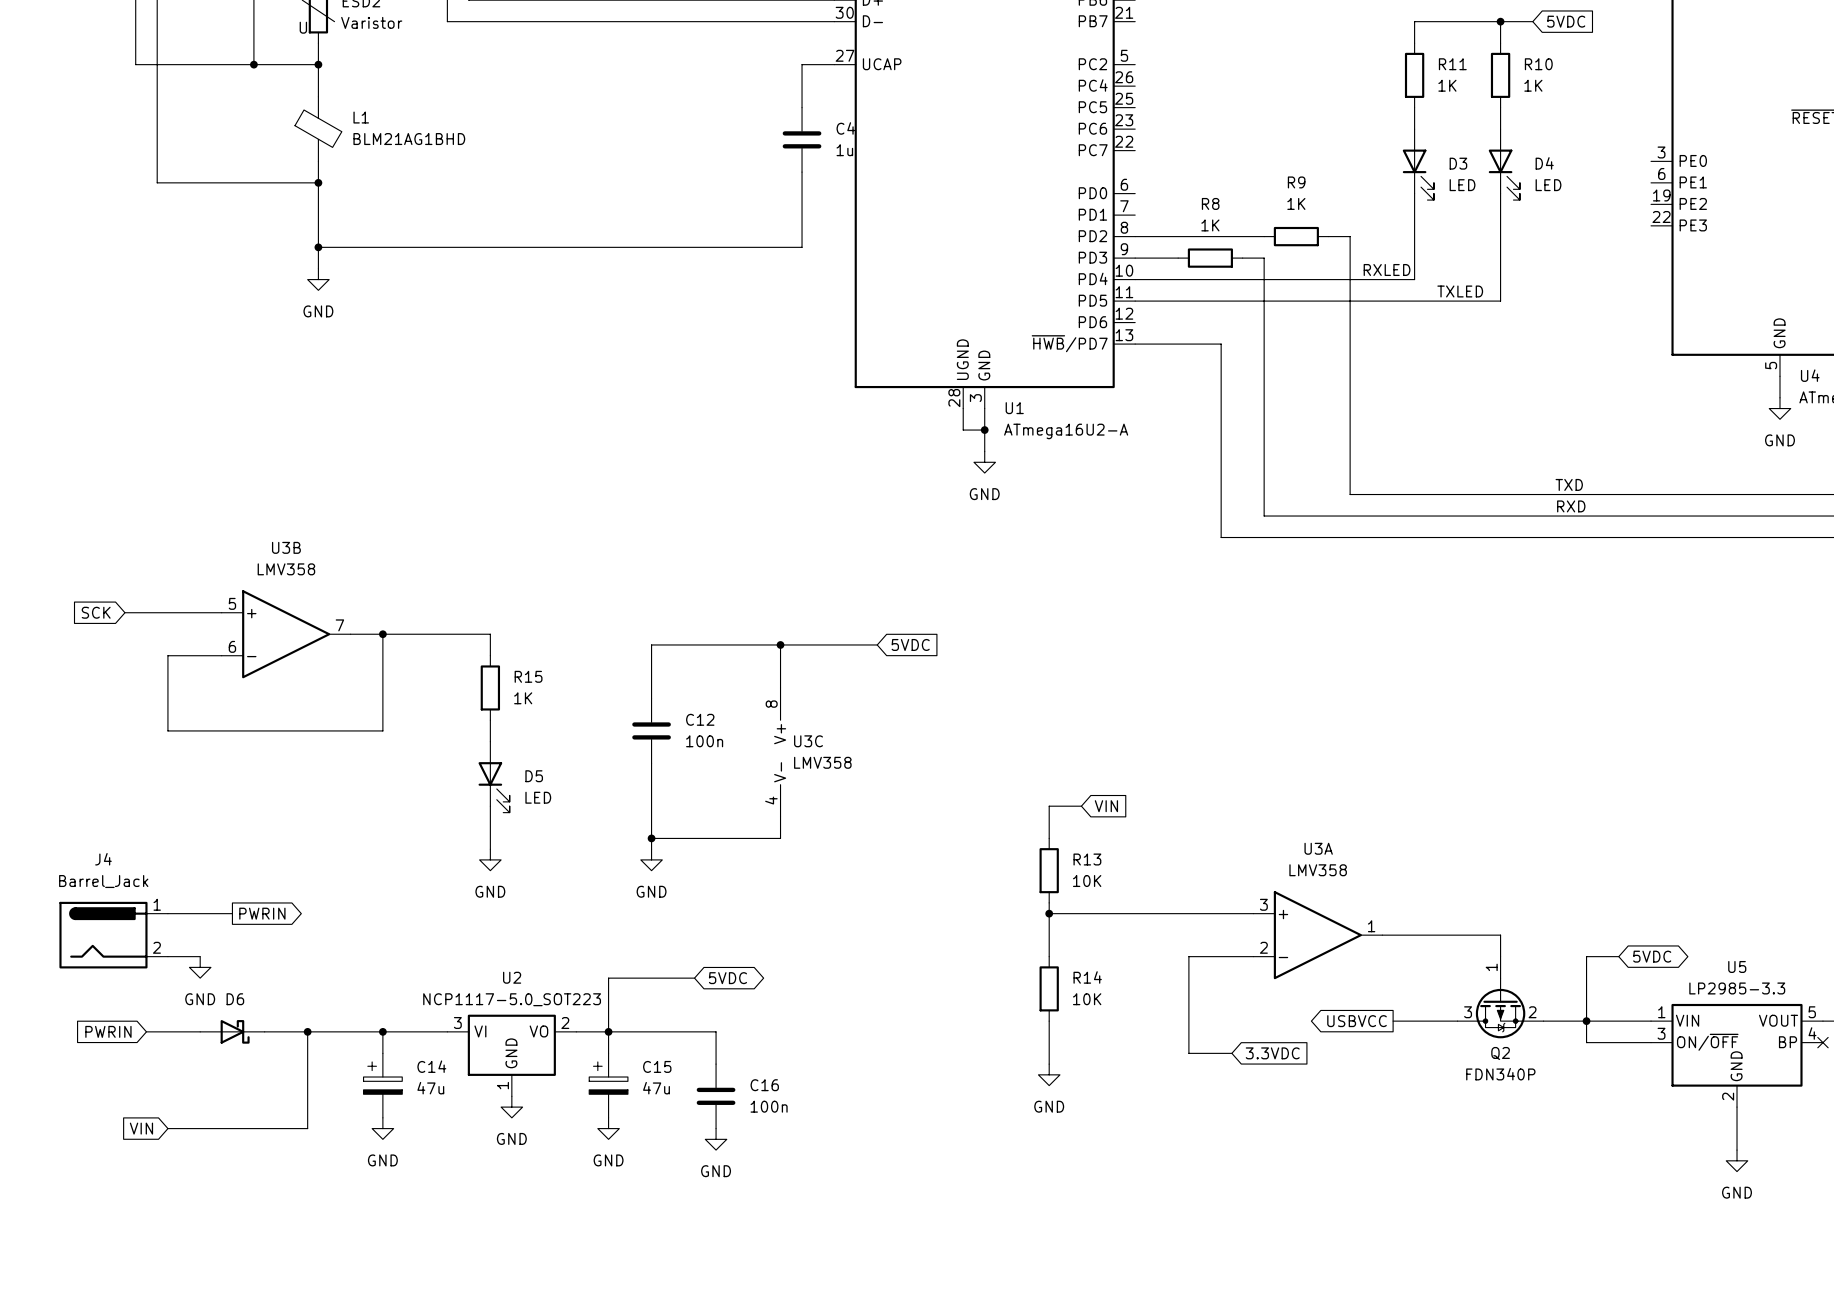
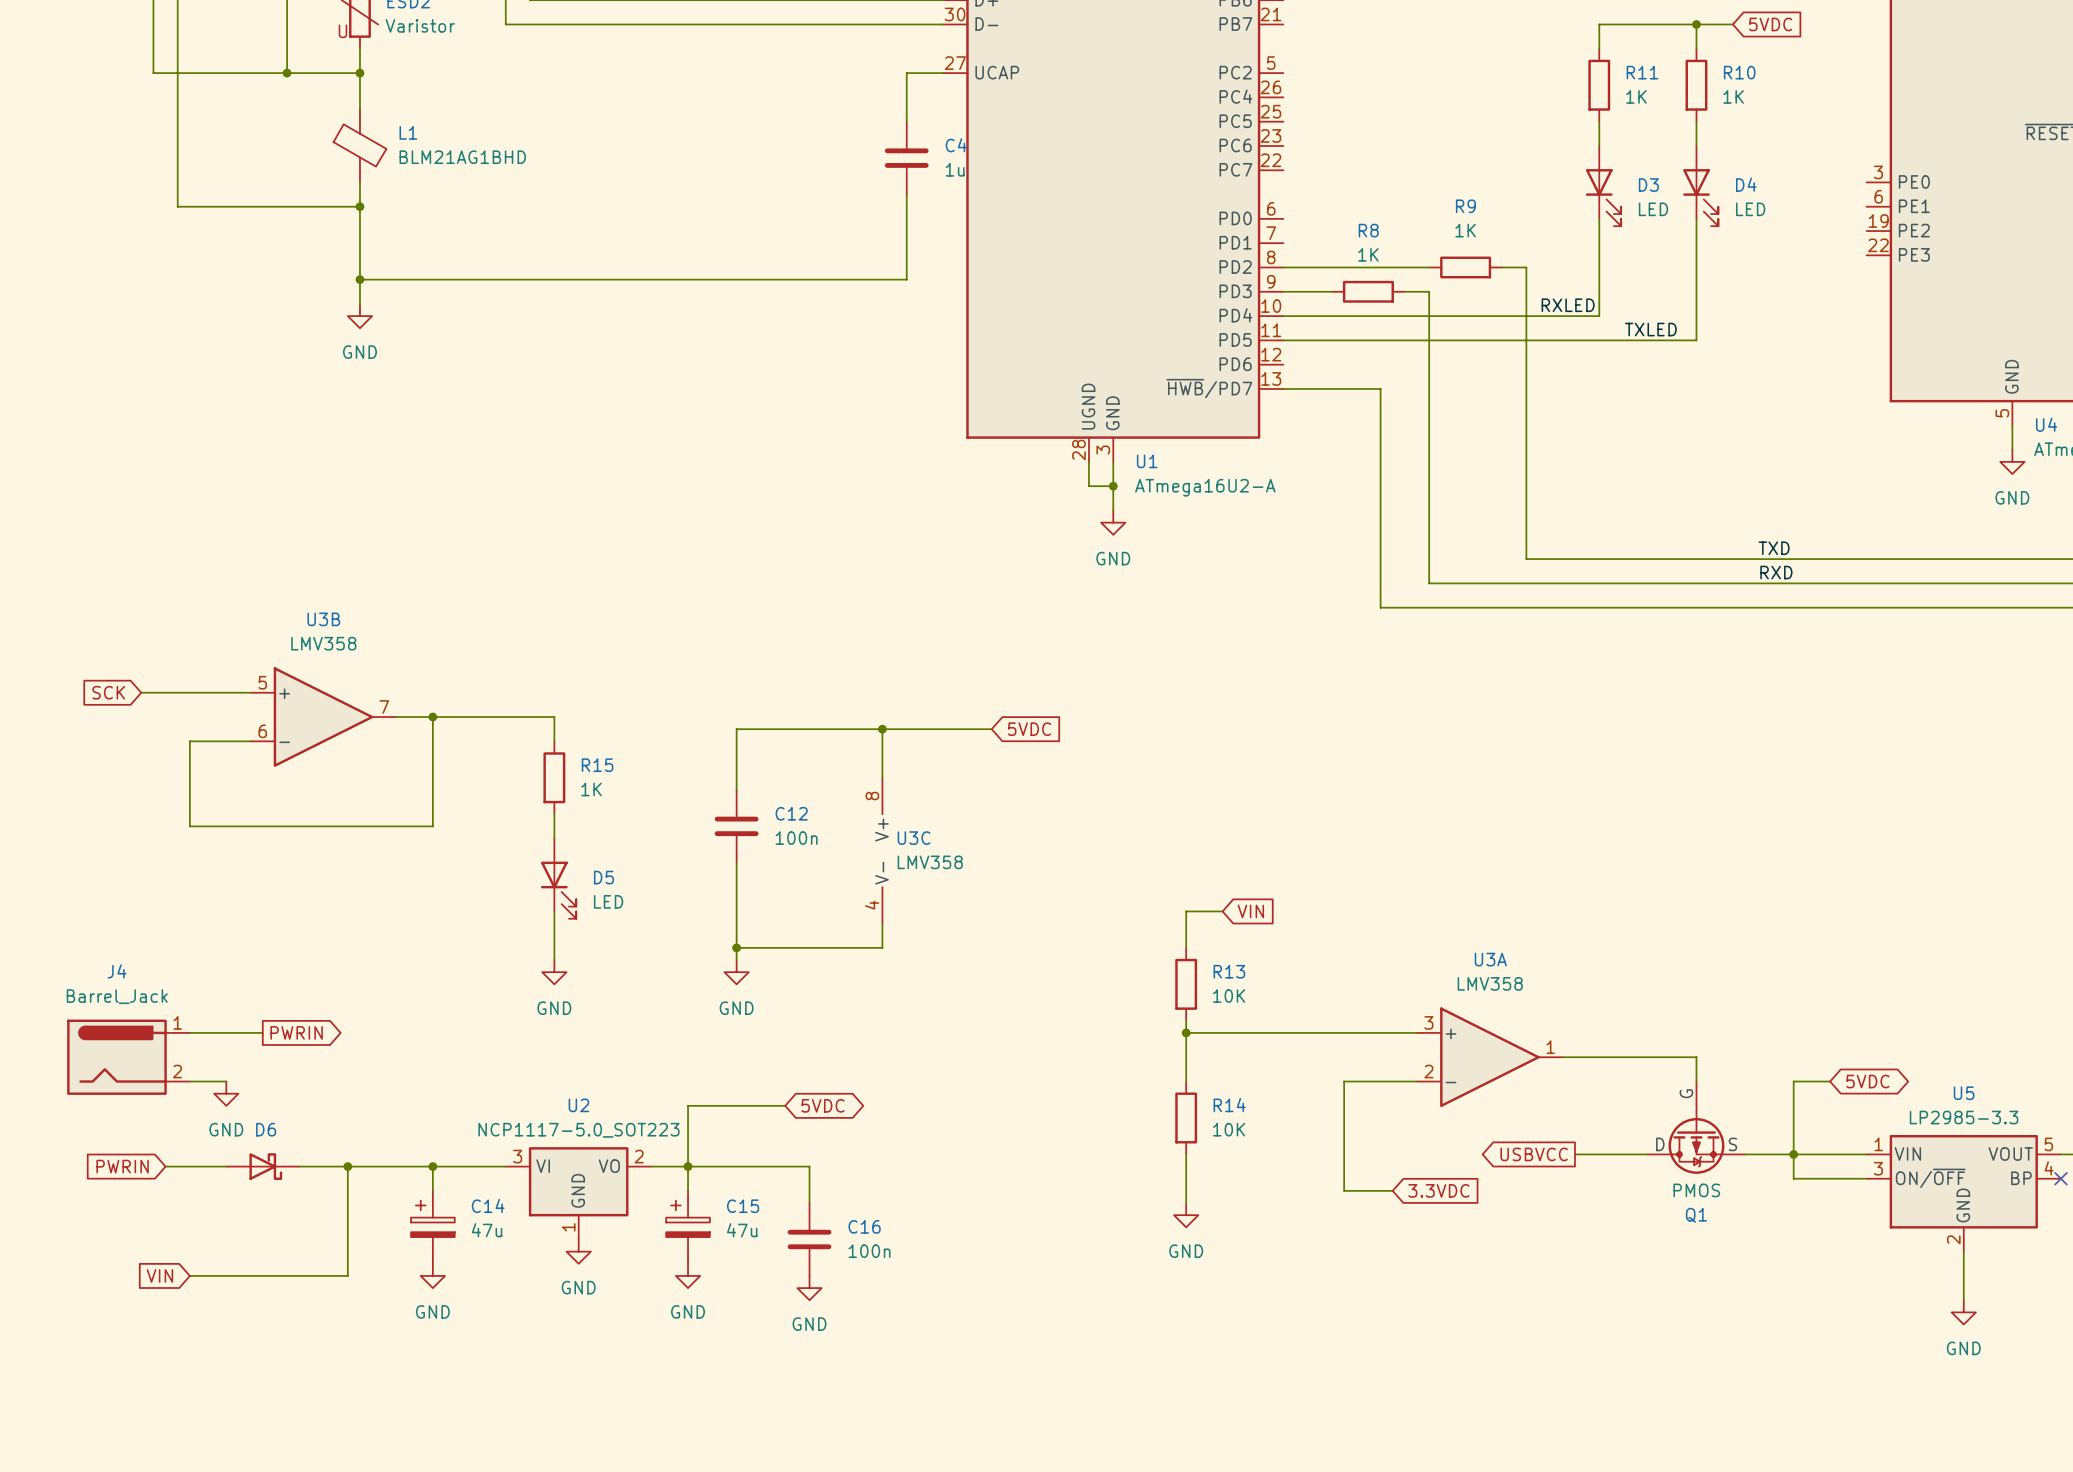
Q2 pin name: none -> G (1686, 1093)
Q2 pin number: 1 (1491, 967) -> none
Q2 pin name: none -> D (1660, 1144)
Q2 pin number: 3 (1468, 1012) -> none
Q2 pin name: none -> S (1732, 1144)
Q2 pin number: 2 (1532, 1012) -> none
Q2 name: Q2 (1500, 1053) -> Q1 (1696, 1215)
Q2 value: FDN340P (1500, 1074) -> PMOS (1696, 1190)

